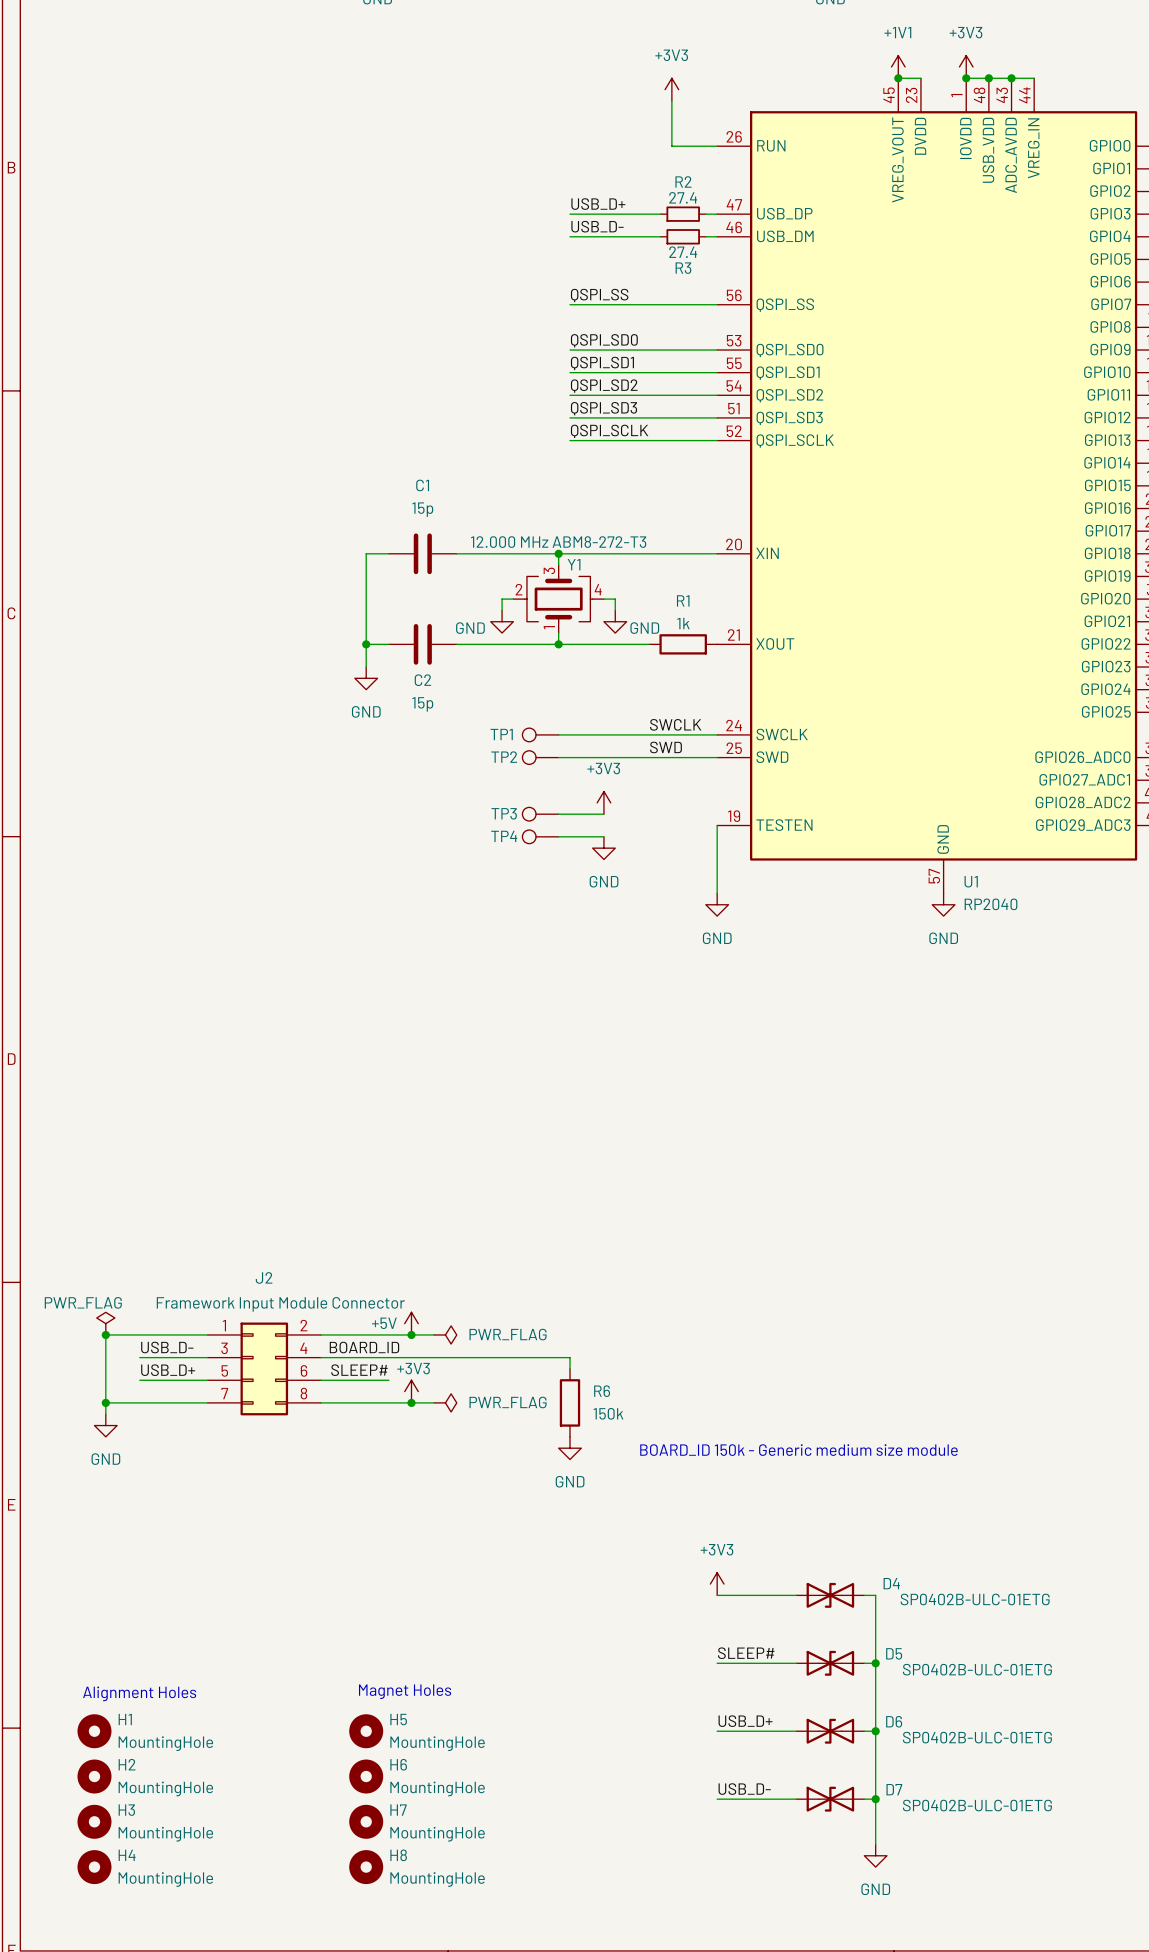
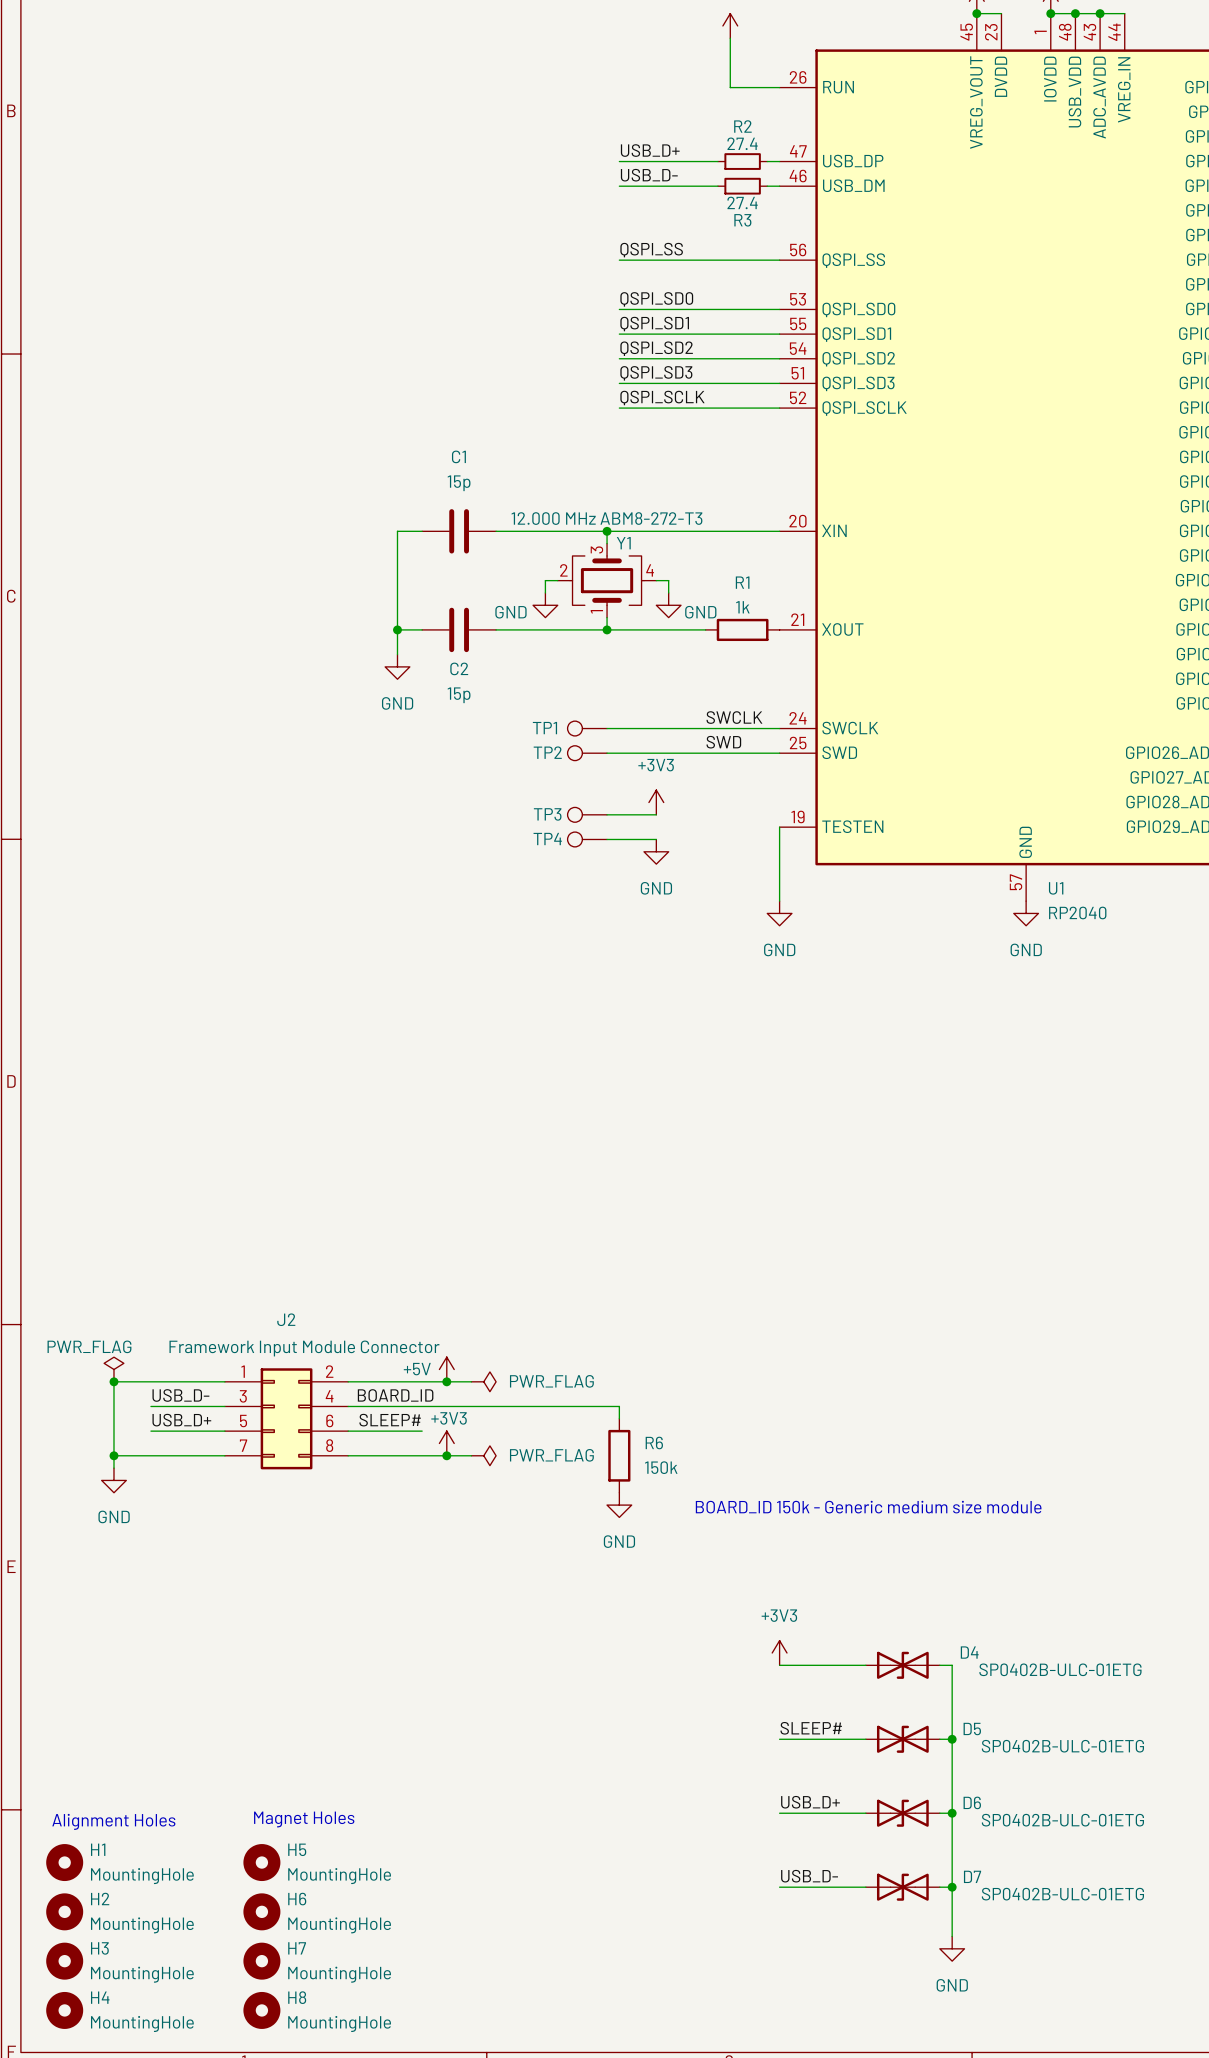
text position: Magnet Holes (405, 1691) -> Magnet Holes (304, 1819)
text position: Alignment Holes (139, 1693) -> Alignment Holes (113, 1821)
H1 position: (94, 1731) -> (64, 1862)
H5 position: (366, 1731) -> (261, 1862)
H2 position: (94, 1776) -> (64, 1911)
H6 position: (366, 1776) -> (261, 1911)
H3 position: (94, 1821) -> (64, 1961)
H7 position: (366, 1821) -> (261, 1961)
H4 position: (94, 1867) -> (64, 2010)
H8 position: (366, 1867) -> (261, 2010)

